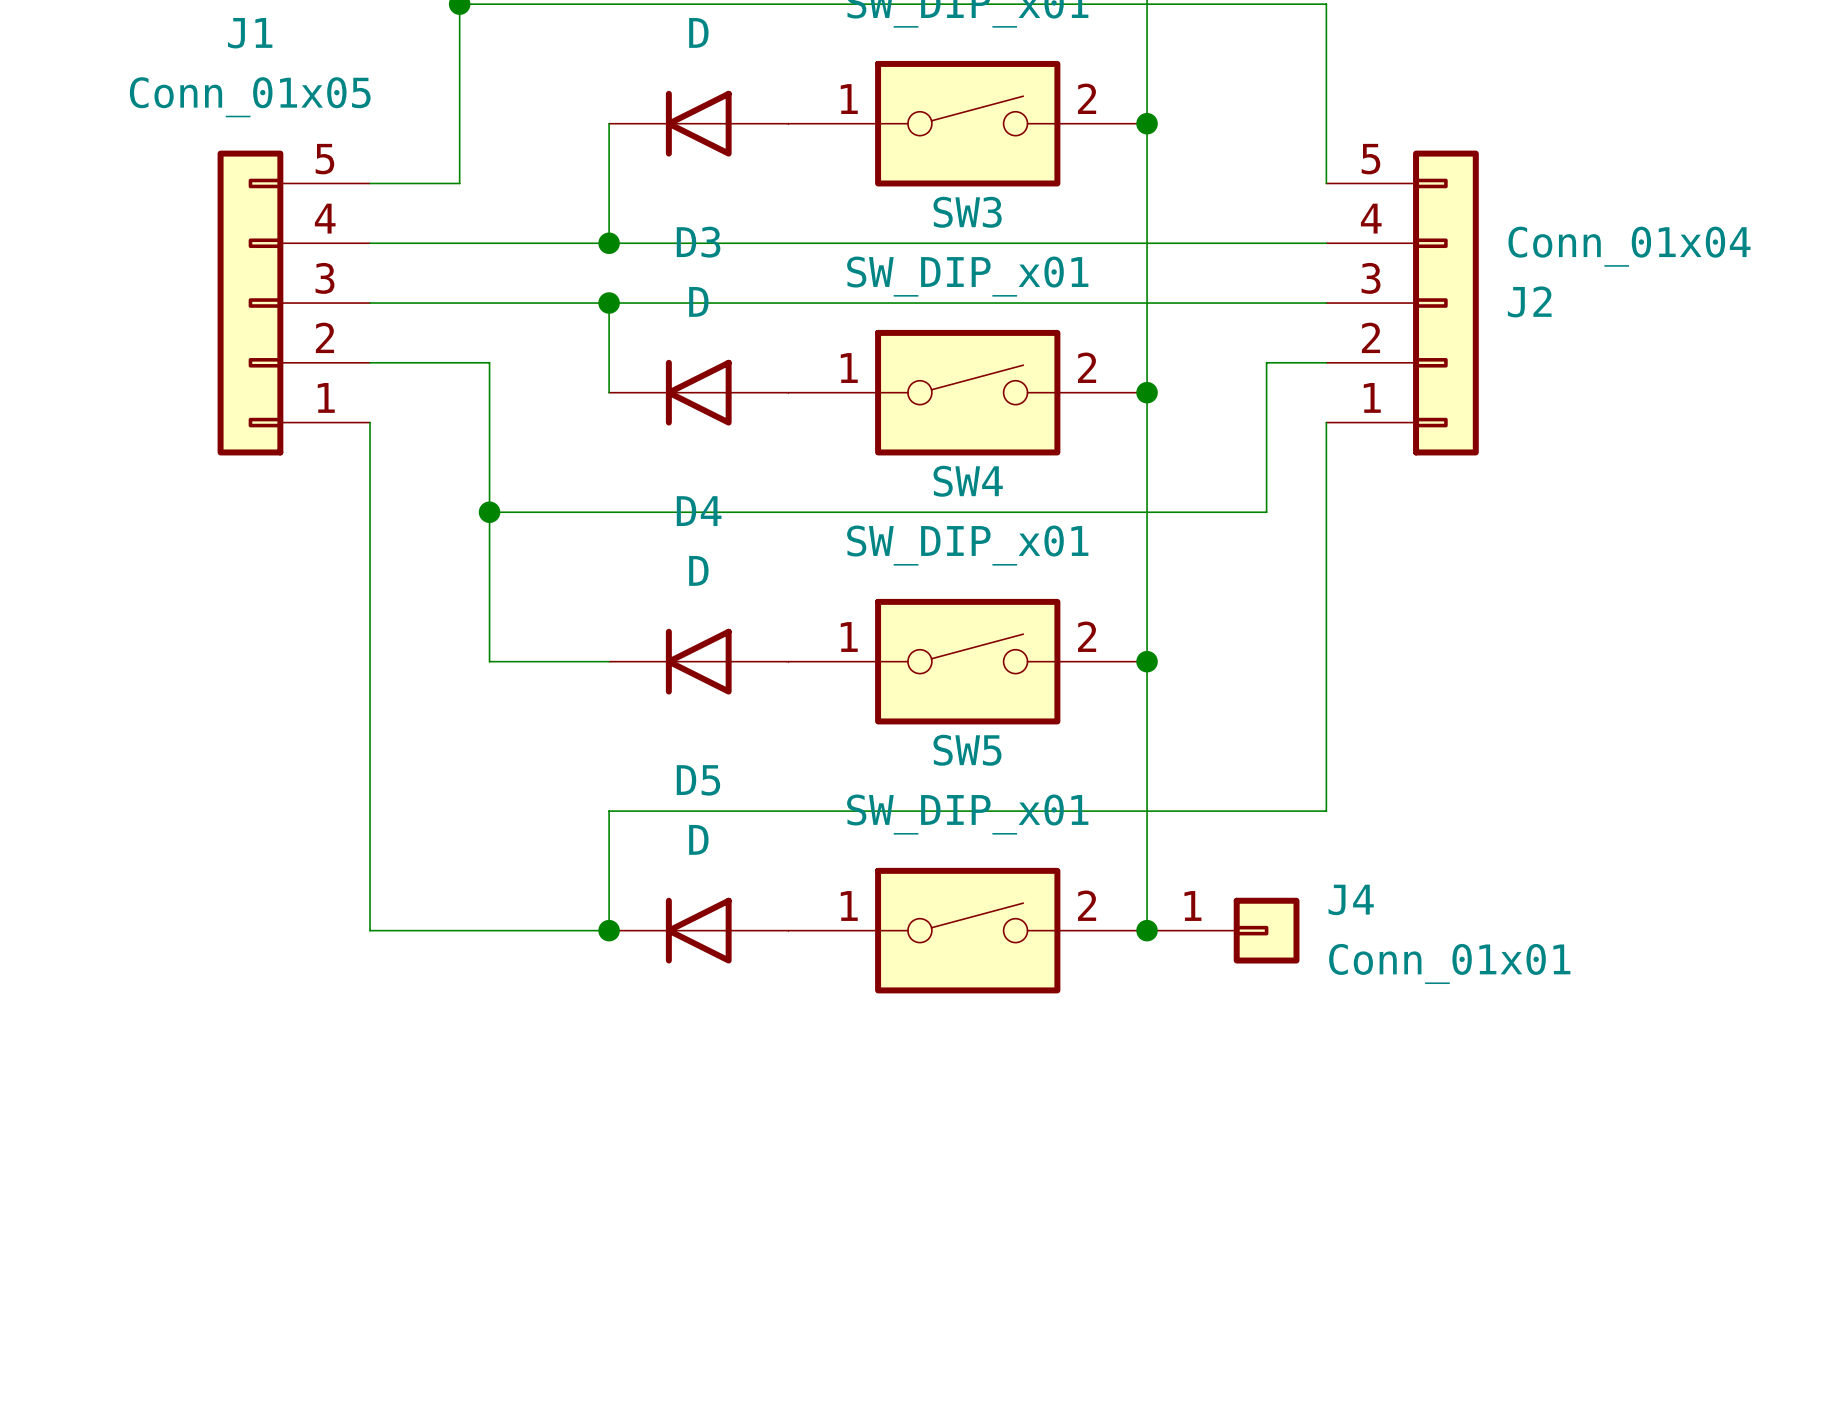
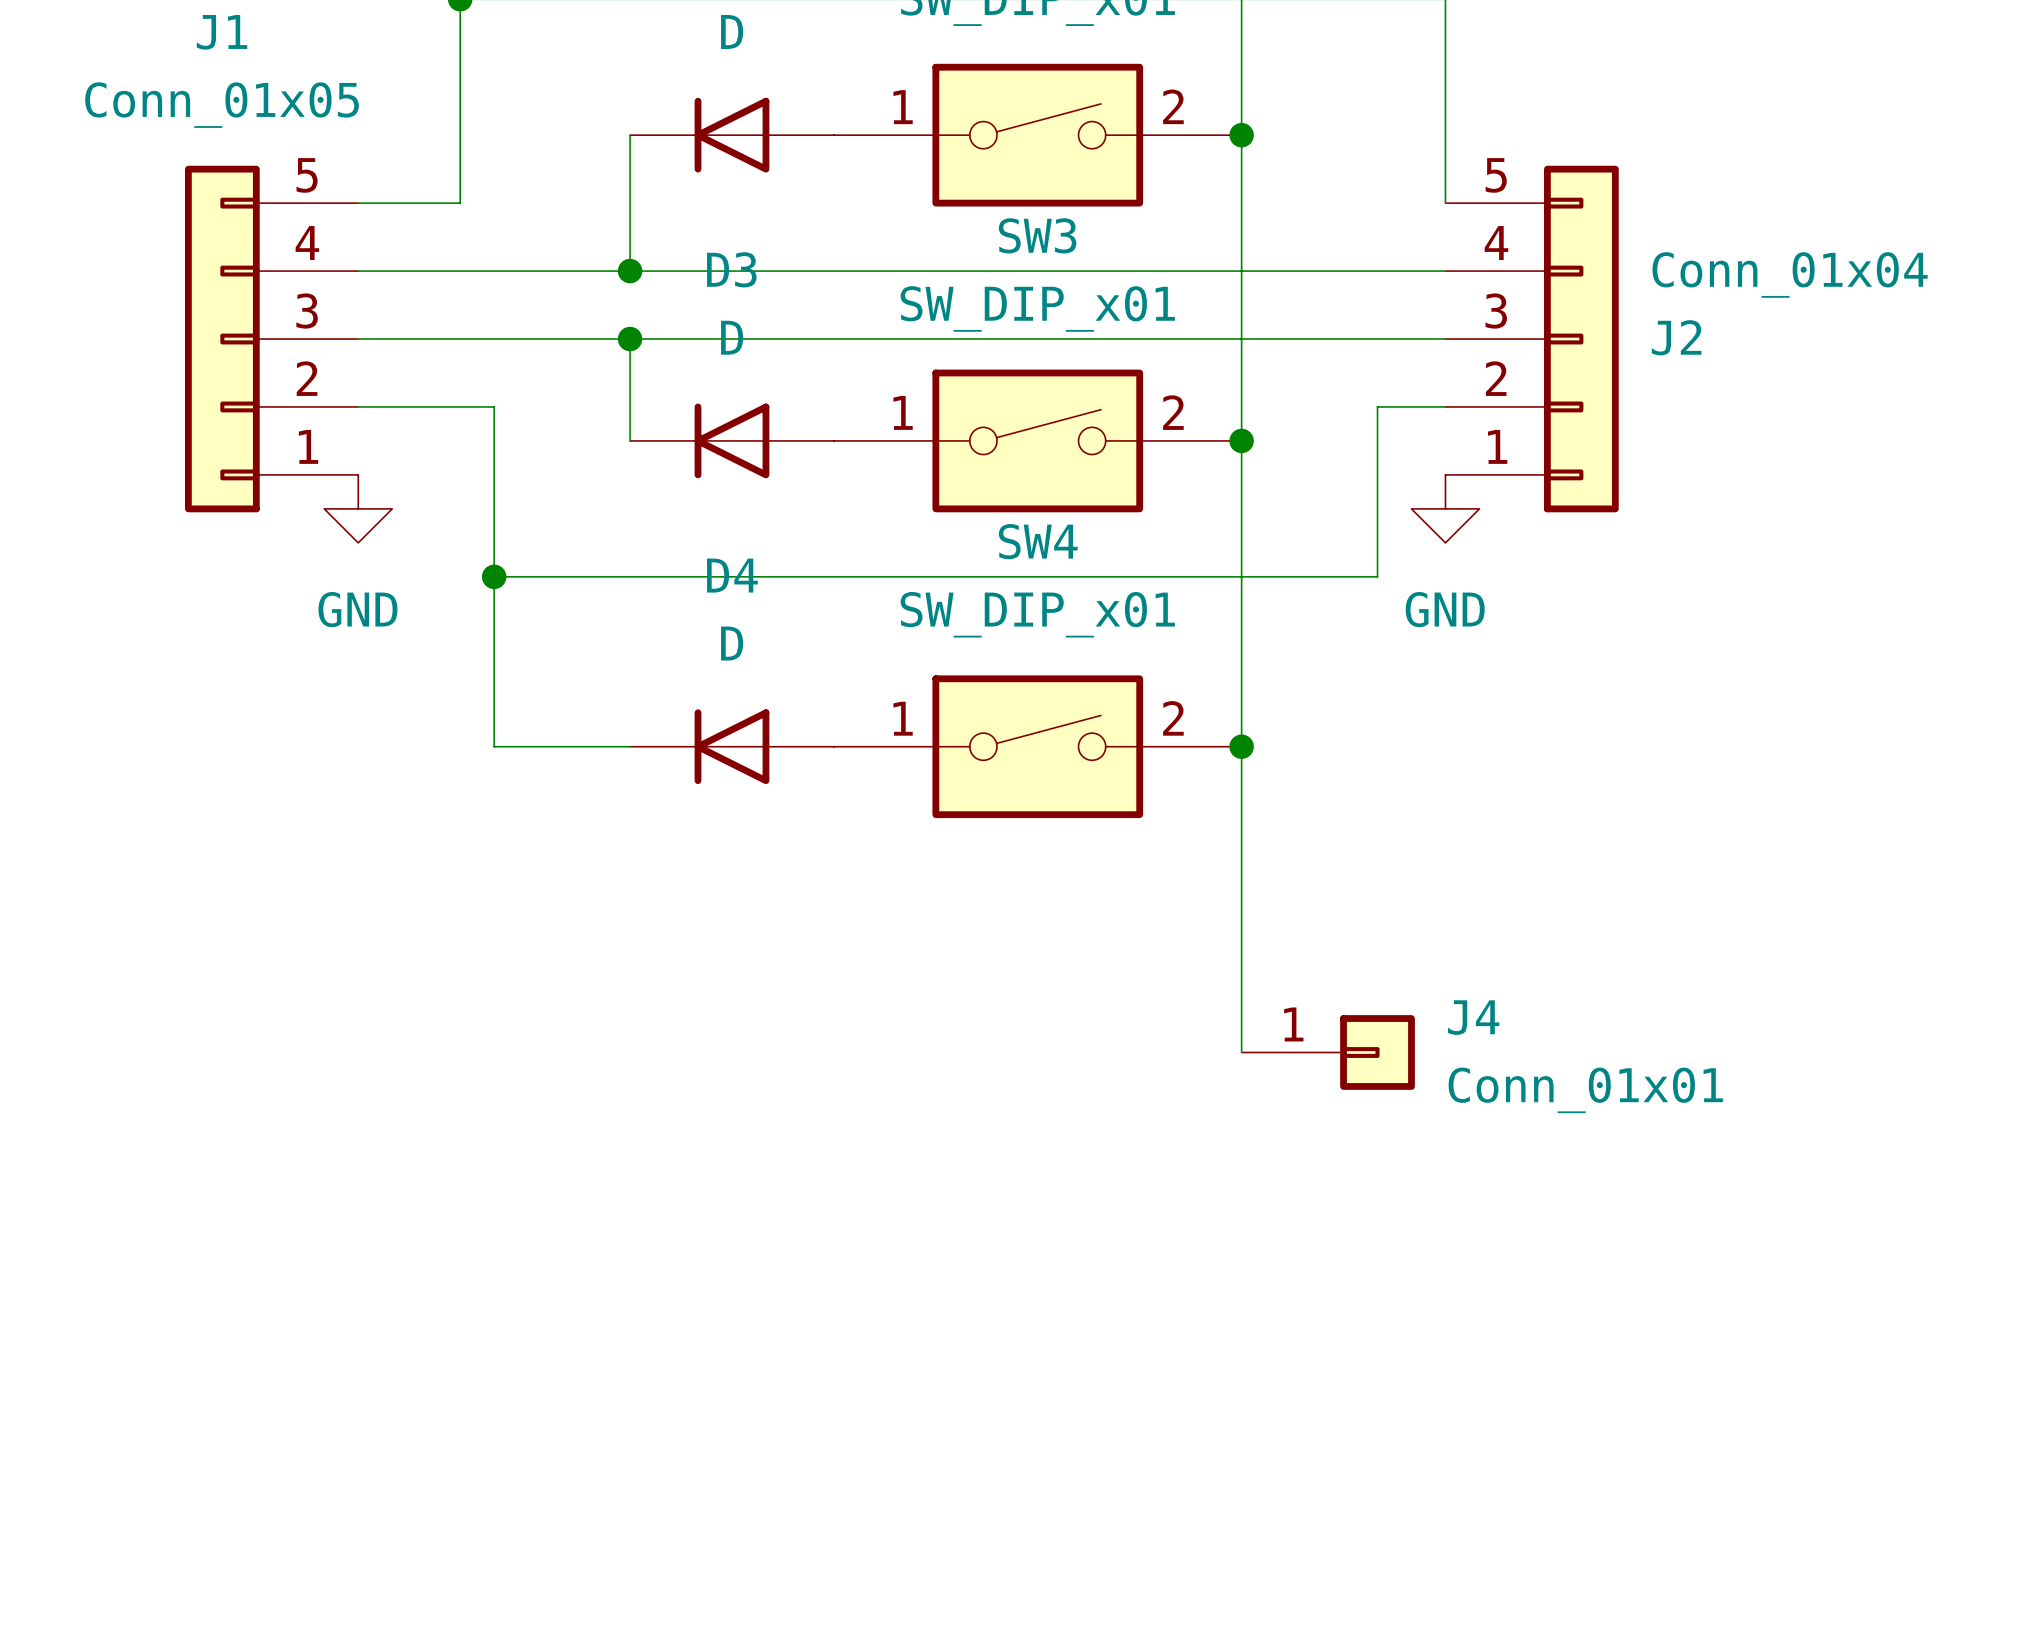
wire: (370, 422) (370, 930) (609, 930) (609, 811) (1326, 811) (1326, 422) -> none
power symbol: none -> GND (358, 508)
power symbol: none -> GND (1445, 508)
junction: (609, 930) -> none
D5: D (698, 930) -> none
SW5: SW_DIP_x01 (967, 930) -> none
junction: (1147, 930) -> none

